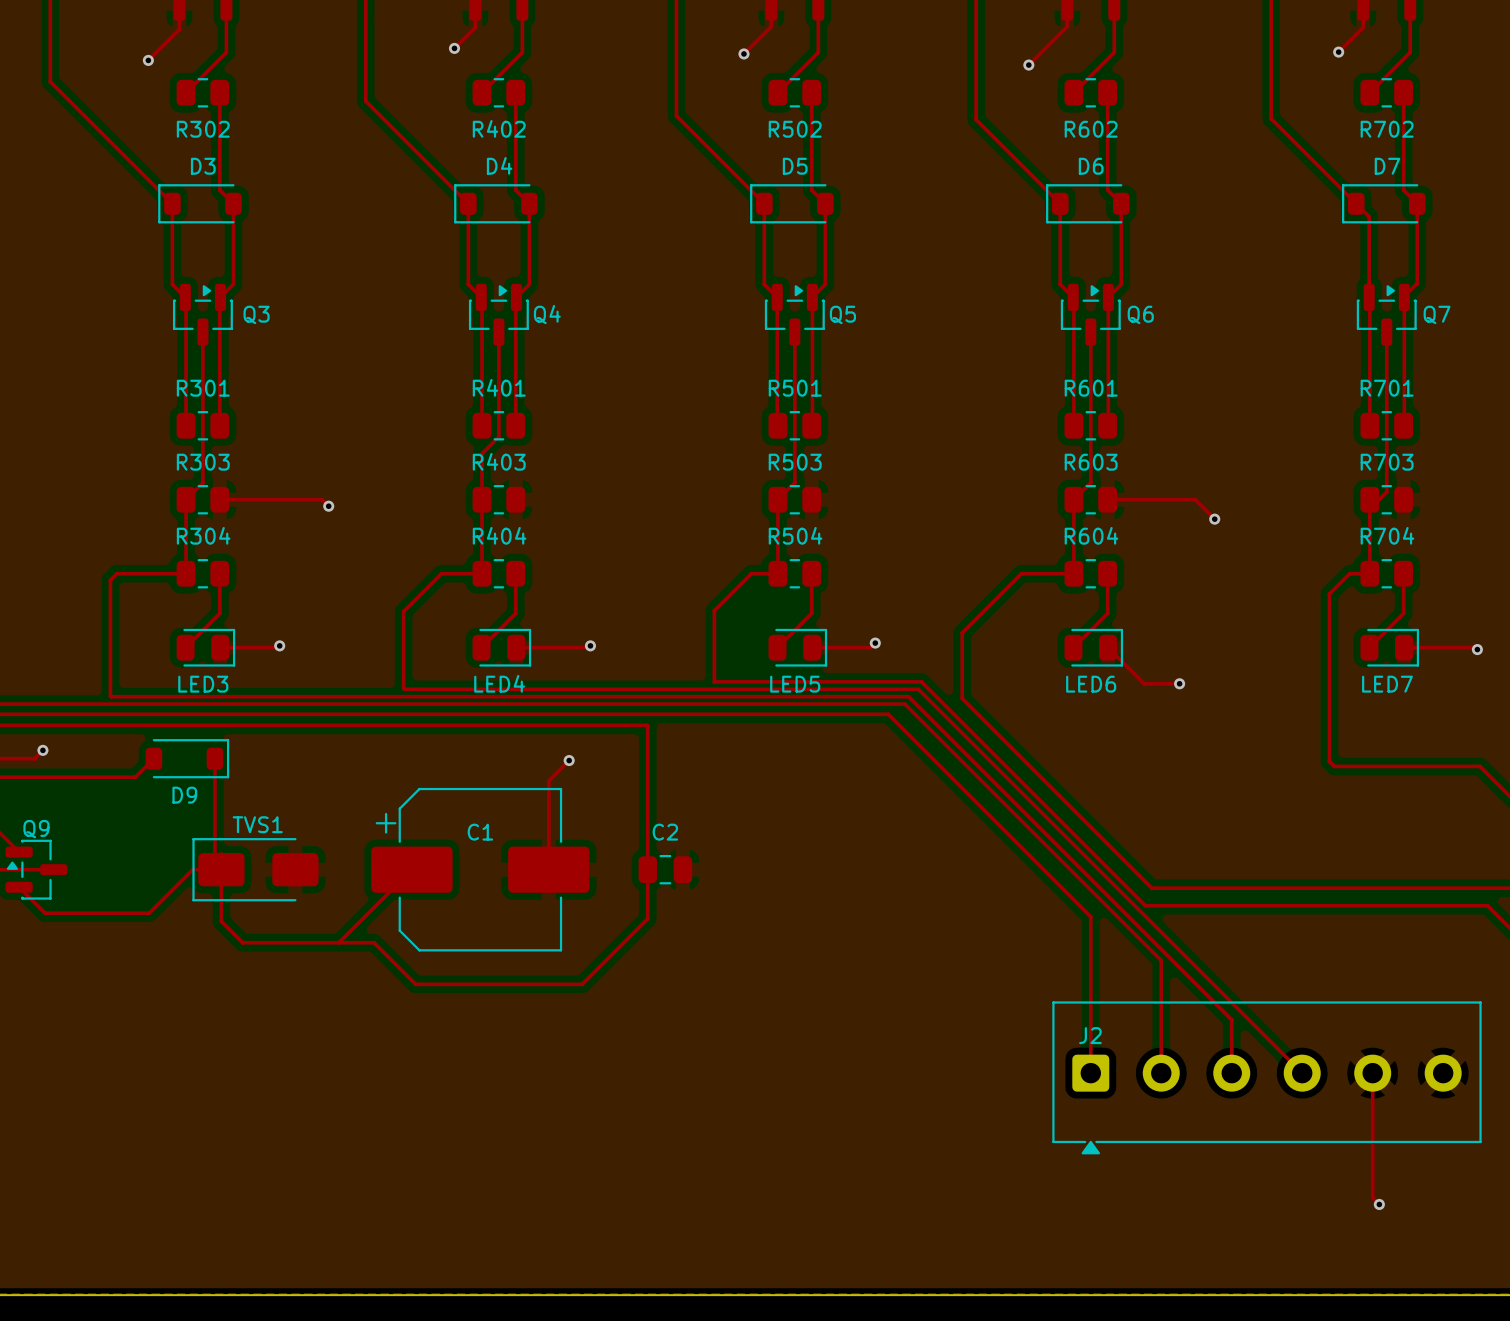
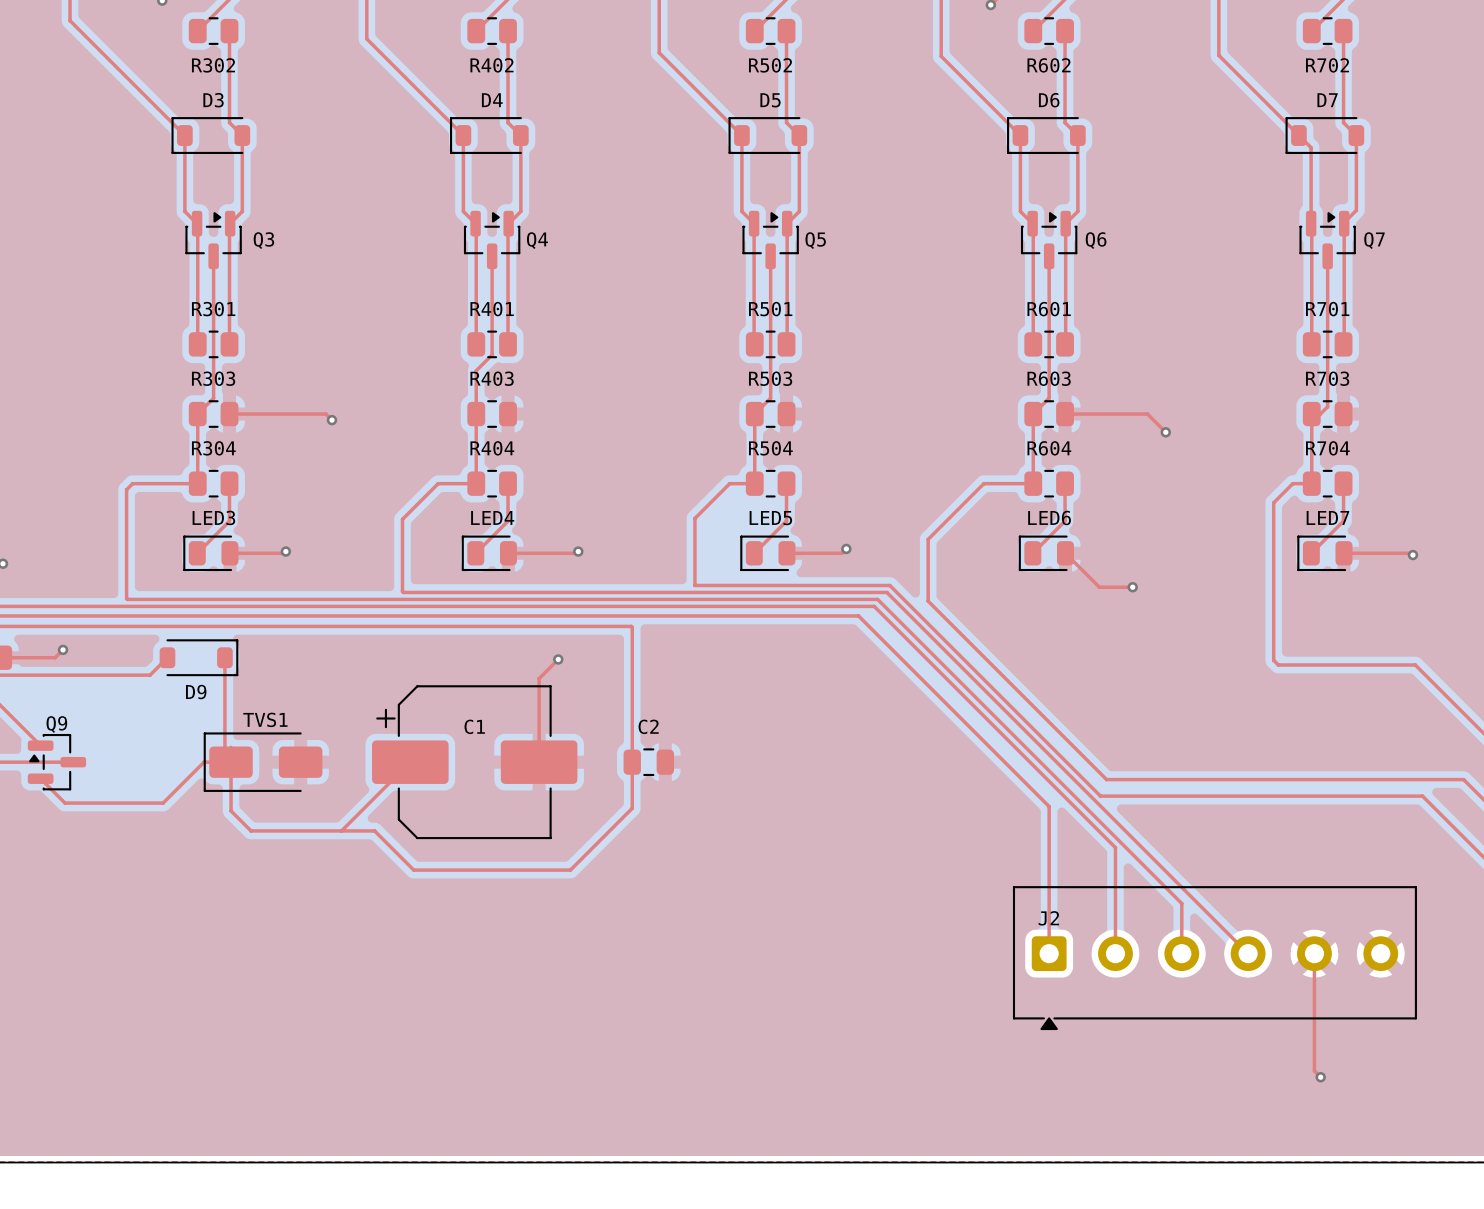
LED3 rotation: 0° (205, 647) -> 180° (210, 553)
LED4 rotation: 0° (501, 647) -> 180° (489, 553)
LED5 rotation: 0° (797, 647) -> 180° (767, 553)
LED6 rotation: 0° (1093, 647) -> 180° (1046, 553)
LED7 rotation: 0° (1389, 647) -> 180° (1324, 553)

